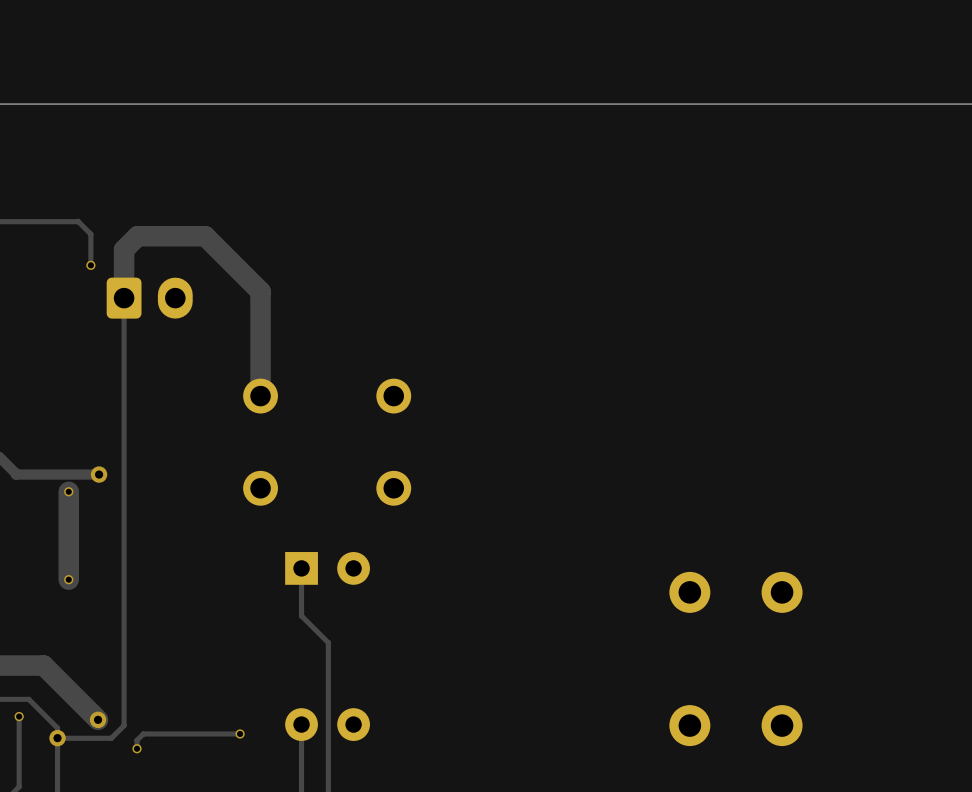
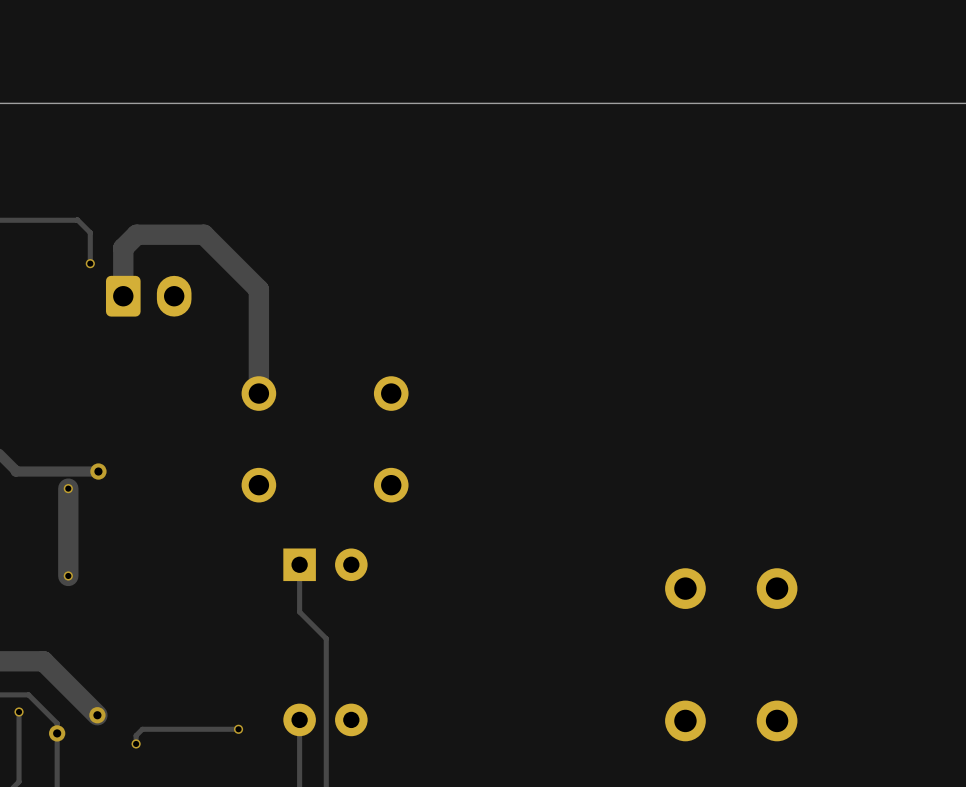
track: (124, 298) (124, 725) (111, 738) (57, 738) -> none

